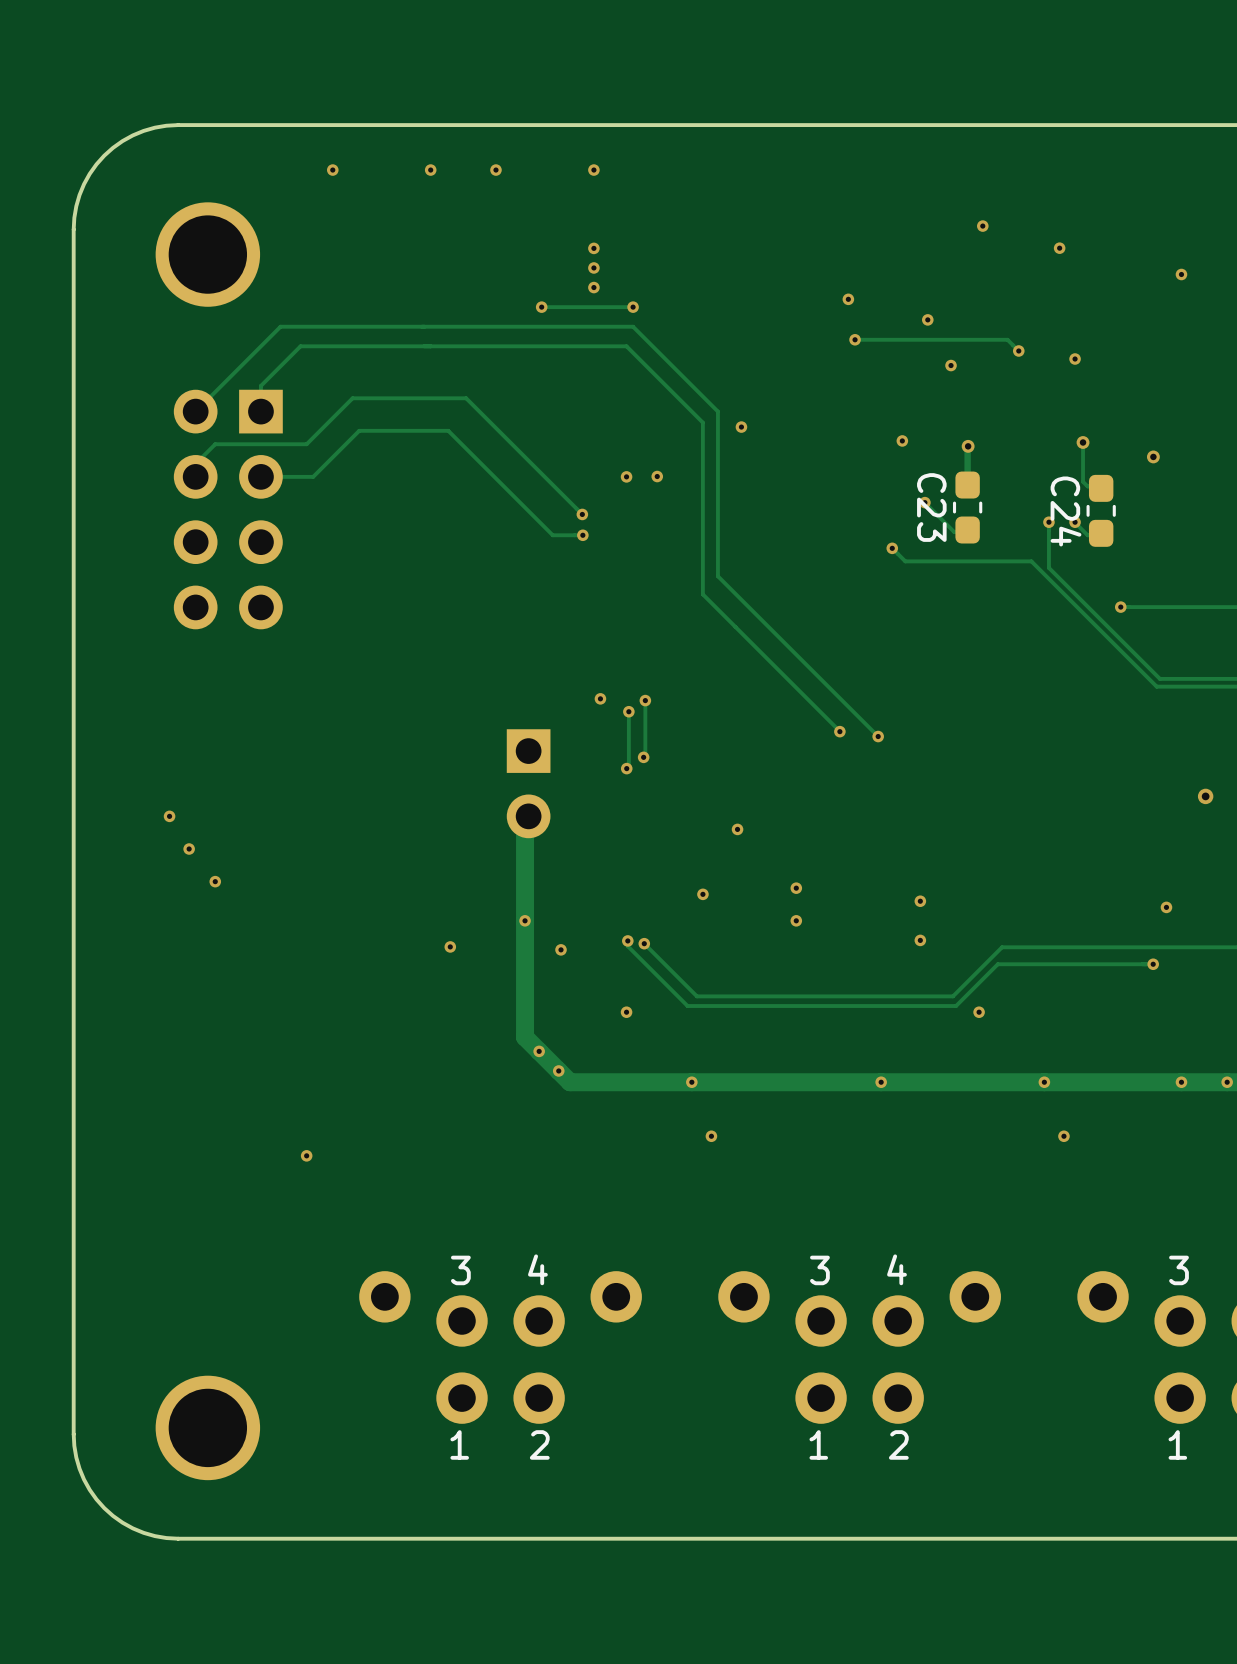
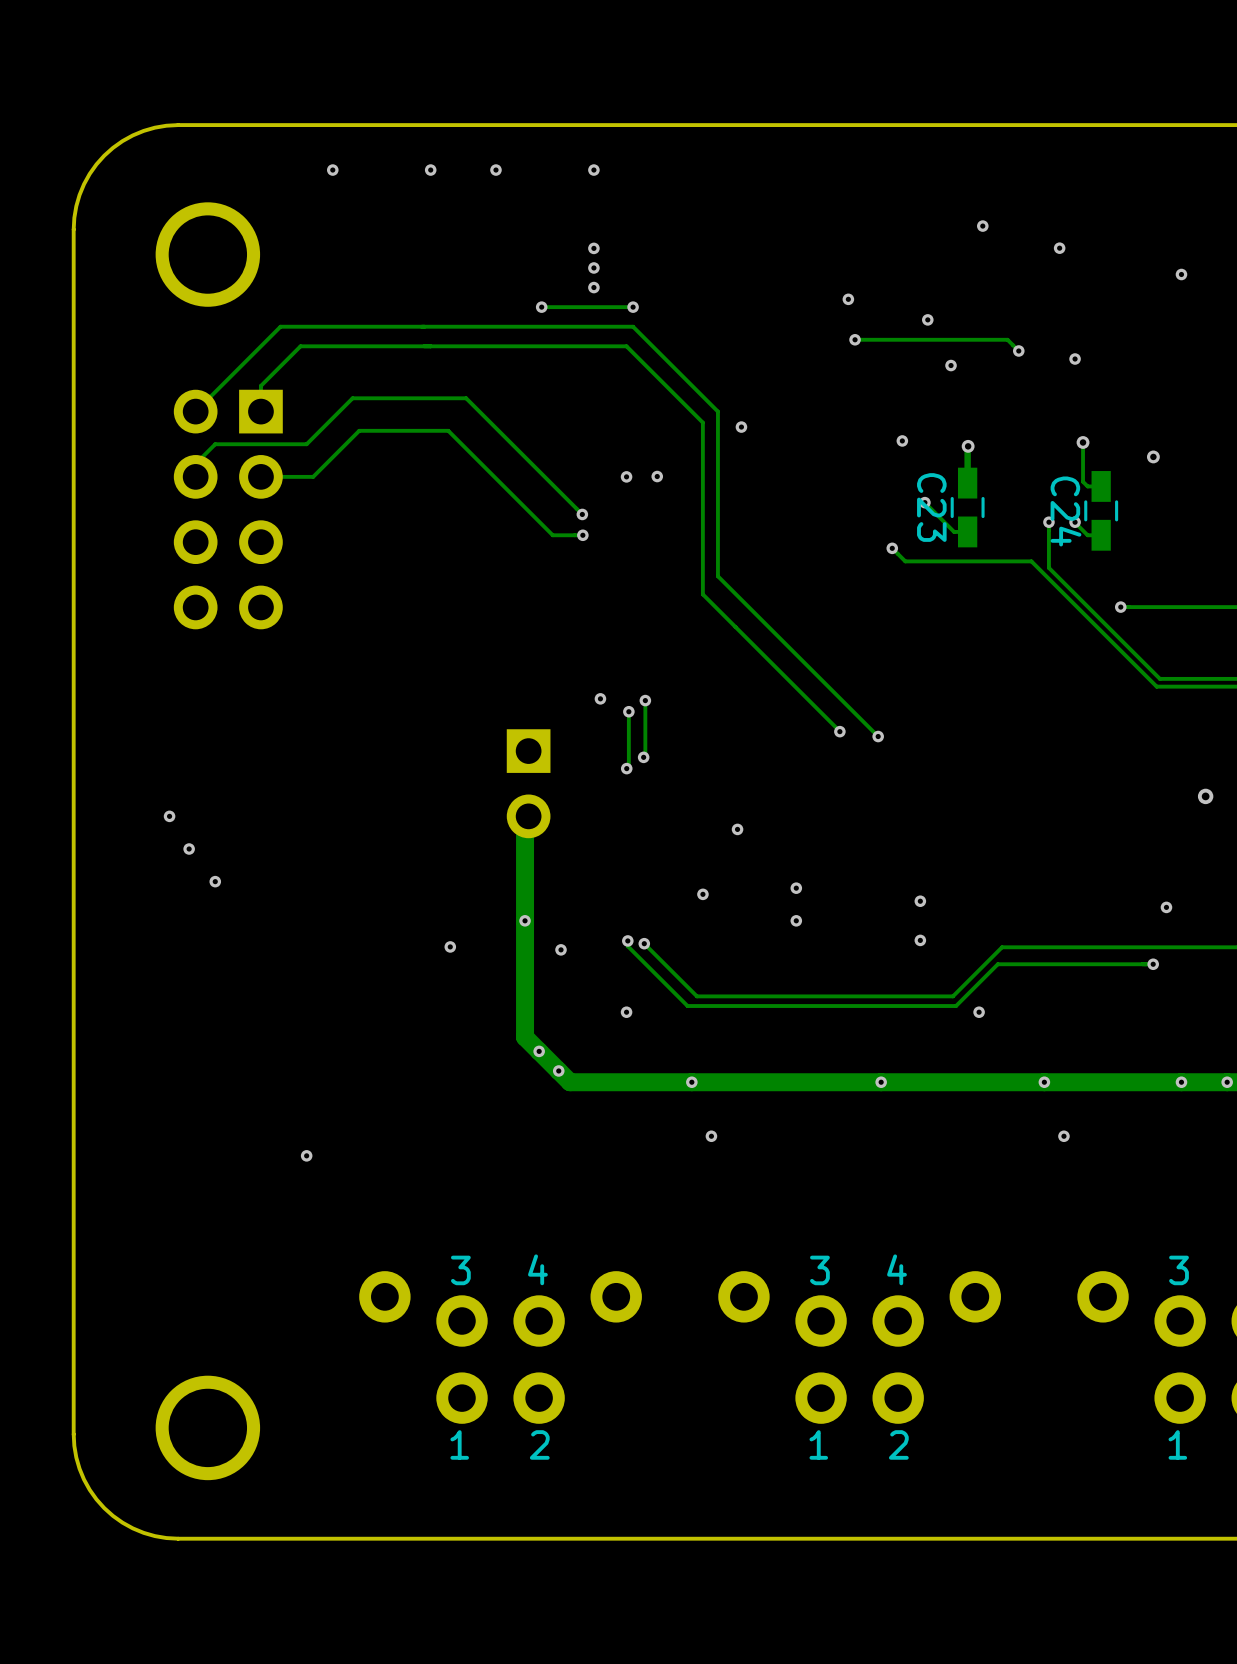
C23 footprint: [952, 471, 983, 544] -> [950, 467, 985, 548]
C24 footprint: [1086, 474, 1116, 547] -> [1084, 471, 1119, 551]

